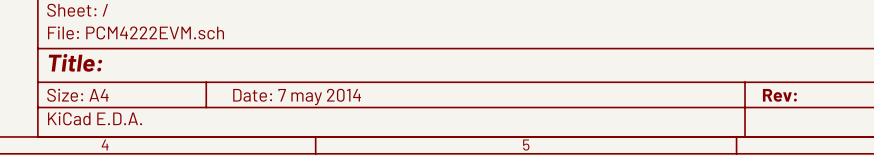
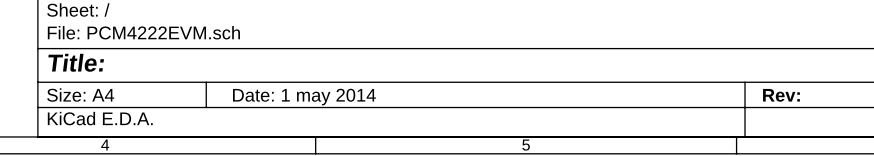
title block: Date: 7 may 2014 (297, 96) -> Date: 1 may 2014 (304, 97)

